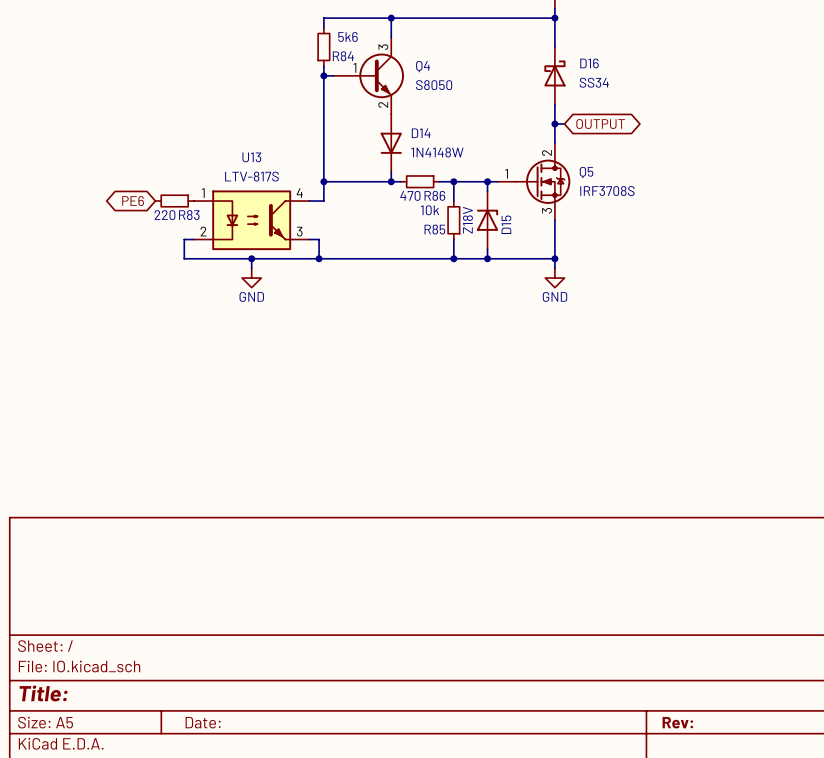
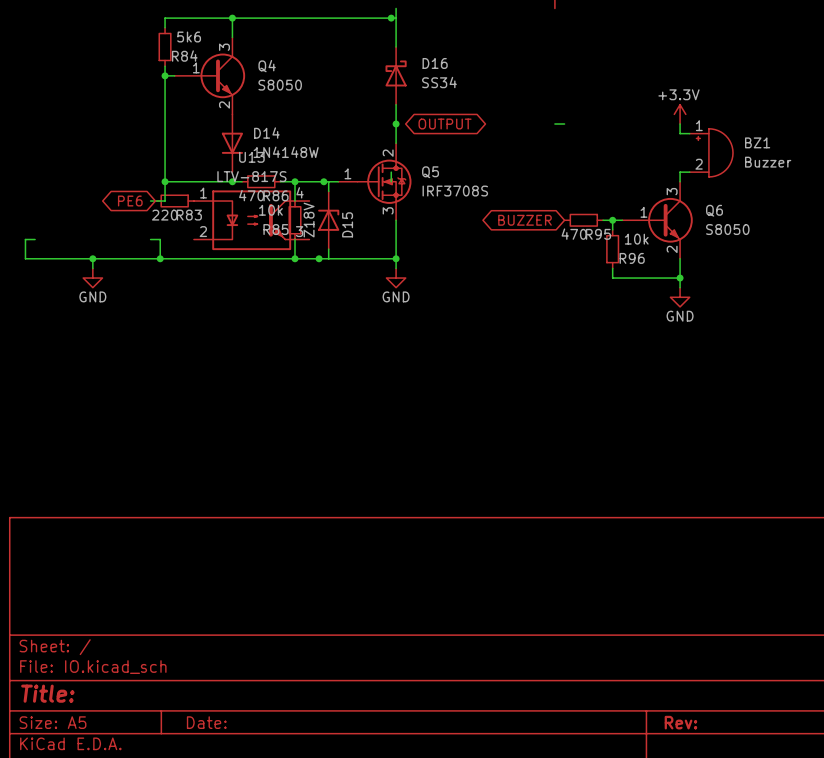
wire: (554, 8) (554, 46) -> (396, 8) (396, 46)
junction: none -> (232, 18)
wire: (323, 18) (323, 27) -> (323, 18) (165, 18) (165, 27)
wire: (391, 18) (391, 37) -> (232, 18) (232, 37)
wire: (396, 18) (554, 18) -> none
junction: (554, 18) -> none
R84 position: (323, 46) -> (165, 46)
wire: (323, 66) (323, 201) (309, 201) -> (165, 66) (165, 201) (150, 201)
junction: none -> (165, 75)
wire: (323, 75) (333, 75) -> (165, 75) (174, 75)
junction: (323, 75) -> none
Q4 position: (368, 75) -> (209, 75)
D16 position: (554, 75) -> (396, 75)
wire: (554, 104) (554, 143) -> (396, 104) (396, 143)
power symbol: none -> +3.3V (680, 114)
junction: none -> (396, 124)
junction: (554, 124) -> none
global label position: OUTPUT (600, 124) -> OUTPUT (445, 124)
wire: none -> (680, 124) (680, 133) (689, 133)
D14 position: (391, 143) -> (232, 143)
BZ1: none -> Buzzer (711, 152)
wire: none -> (689, 172) (680, 172) (680, 181)
wire: none -> (165, 181) (242, 181)
junction: none -> (165, 181)
junction: none -> (232, 181)
wire: none -> (280, 181) (323, 181)
junction: none -> (295, 181)
junction: (391, 181) -> none
R86 position: (420, 181) -> (261, 181)
wire: (439, 181) (497, 181) -> none
wire: (453, 181) (453, 201) -> (295, 181) (295, 201)
junction: (453, 181) -> none
wire: (487, 181) (487, 191) -> (328, 181) (328, 191)
junction: (487, 181) -> none
Q5 position: (533, 181) -> (374, 181)
R85 position: (453, 220) -> (295, 220)
D15 position: (487, 220) -> (328, 220)
global label: none -> BUZZER (524, 220)
wire: (554, 220) (554, 268) -> (396, 220) (396, 268)
R95: none -> 470 (583, 220)
wire: none -> (603, 220) (622, 220)
wire: none -> (612, 220) (612, 229)
junction: none -> (612, 220)
Q6: none -> S8050 (657, 220)
wire: (193, 239) (184, 239) (184, 258) -> (35, 239) (25, 239) (25, 258) (184, 258)
wire: (309, 239) (319, 239) (319, 258) -> (150, 239) (160, 239) (160, 258)
wire: (453, 239) (453, 258) -> (295, 239) (295, 258)
wire: (487, 249) (487, 258) -> (328, 249) (328, 258)
R96: none -> 10k (612, 249)
junction: none -> (92, 258)
junction: none -> (160, 258)
wire: (251, 258) (251, 268) -> (92, 258) (92, 268)
junction: (251, 258) -> none
junction: none -> (295, 258)
wire: (396, 258) (554, 258) -> none
junction: none -> (396, 258)
junction: (453, 258) -> none
junction: (487, 258) -> none
junction: (554, 258) -> none
wire: none -> (680, 258) (680, 287)
wire: none -> (612, 268) (612, 278) (680, 278)
power symbol: none -> GND (92, 278)
power symbol: GND (251, 278) -> none
power symbol: none -> GND (396, 278)
power symbol: GND (554, 278) -> none
junction: none -> (680, 278)
power symbol: none -> GND (680, 297)

